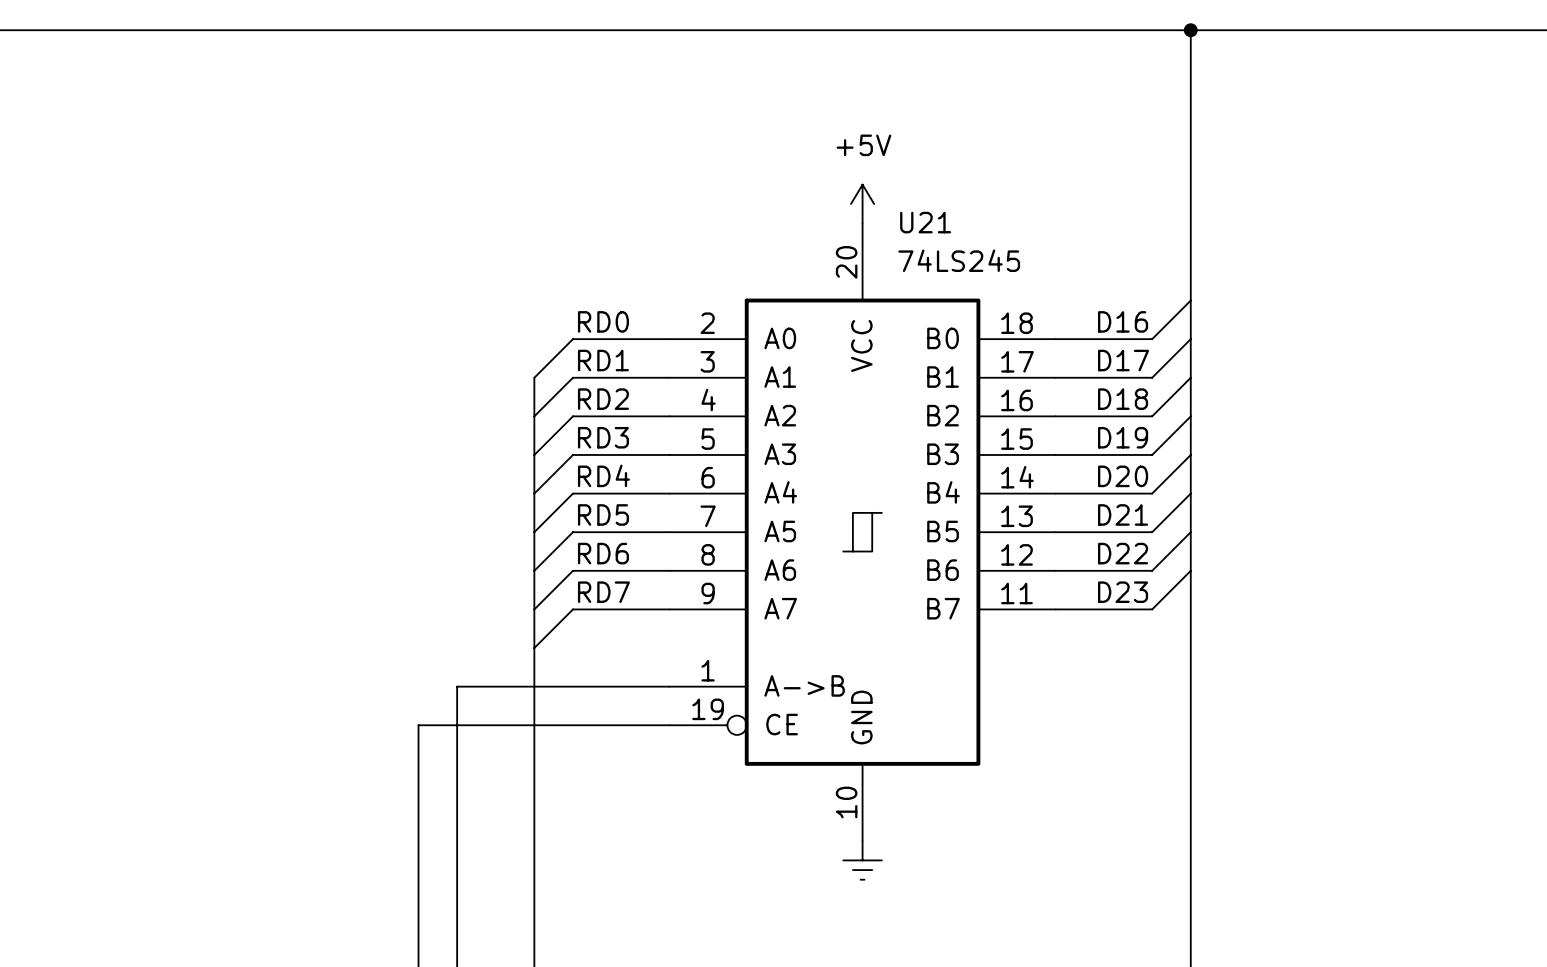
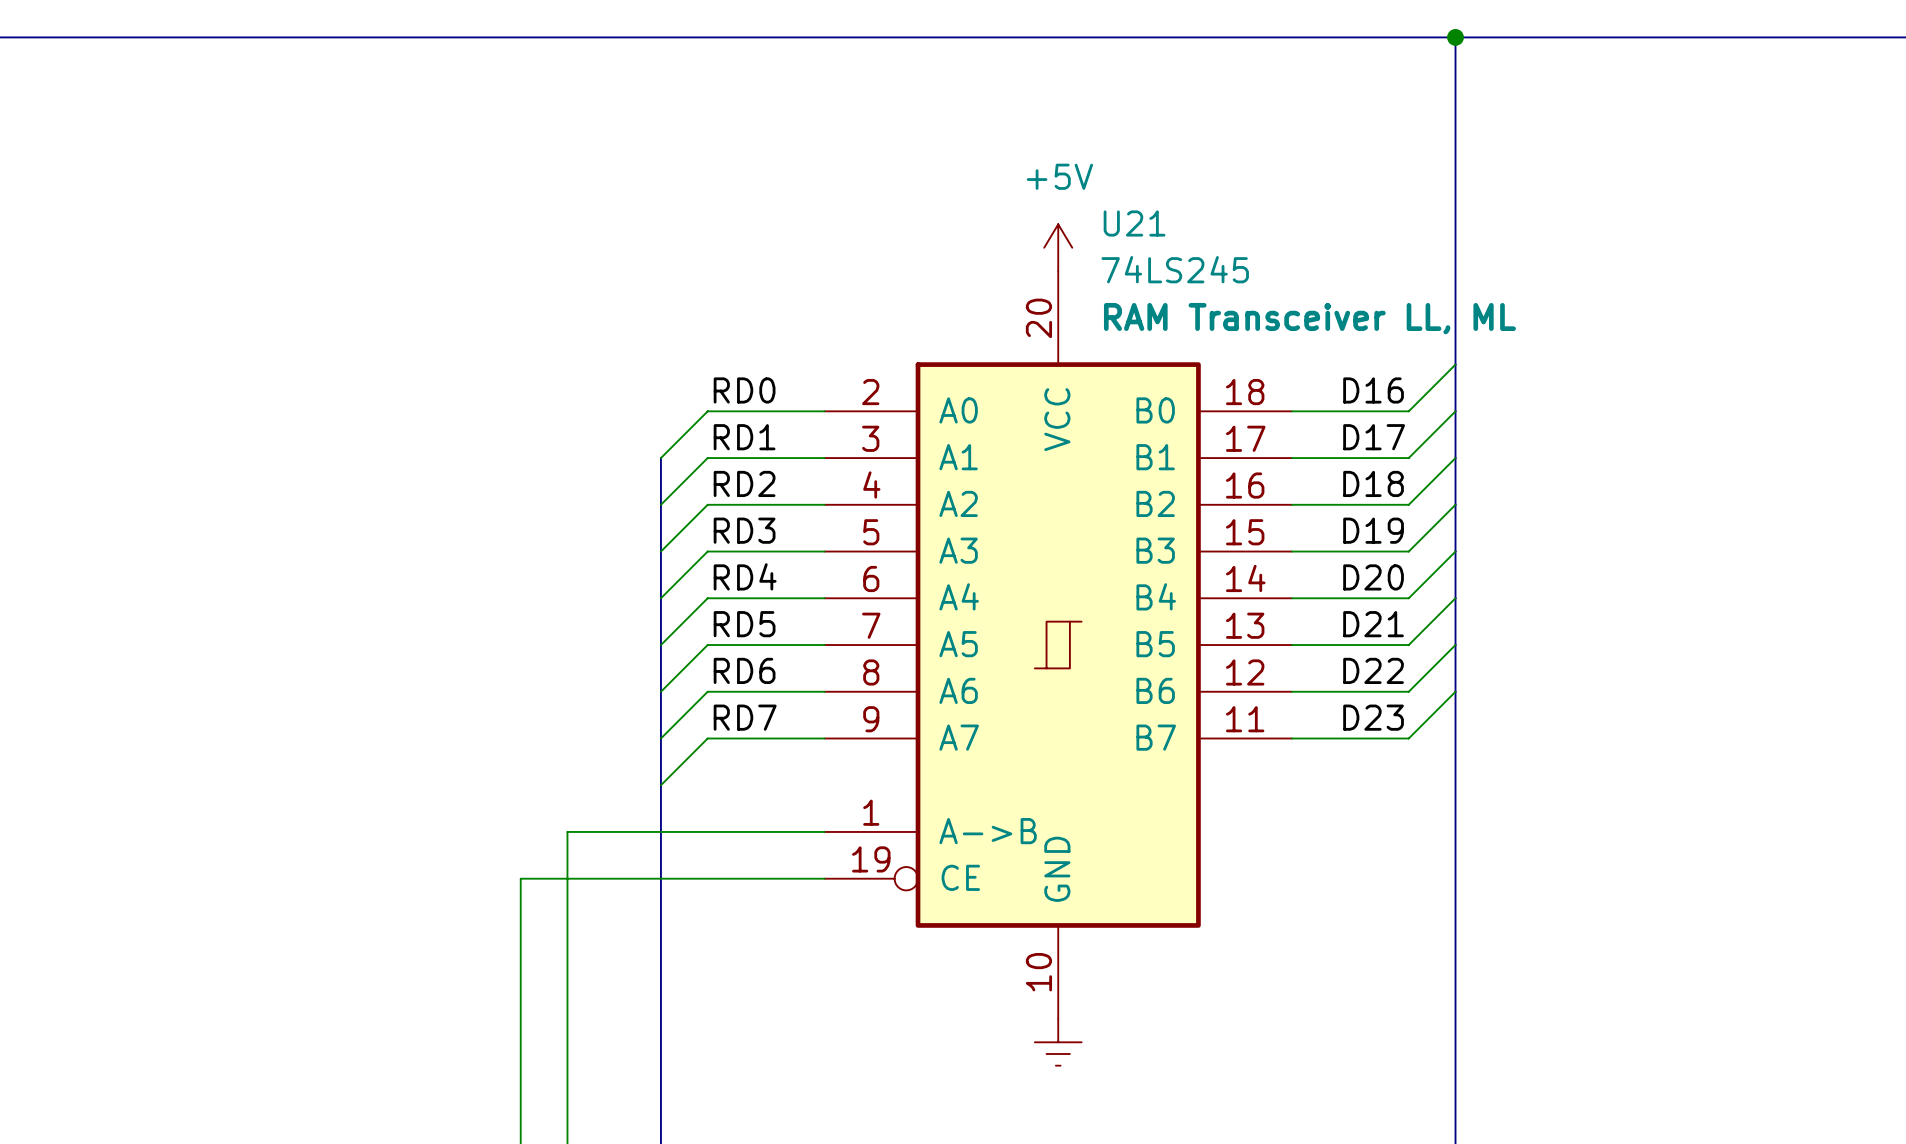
U21 name position: U21 (925, 222) -> U21 (1134, 223)
U21 value position: 74LS245 (959, 260) -> 74LS245 (1175, 269)
U21 text: none -> RAM Transceiver LL, ML (1309, 318)

